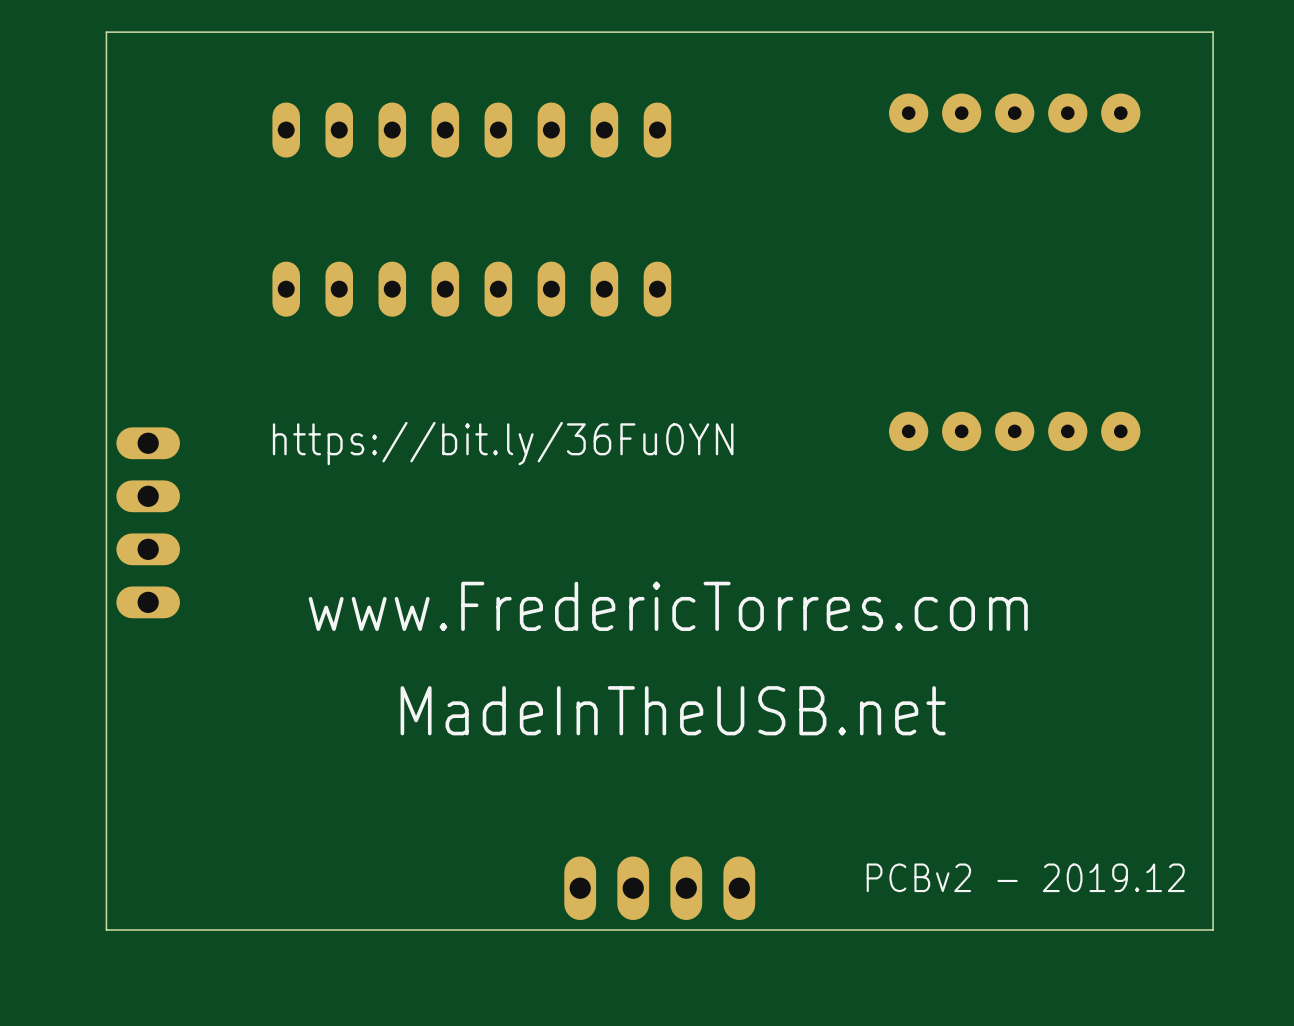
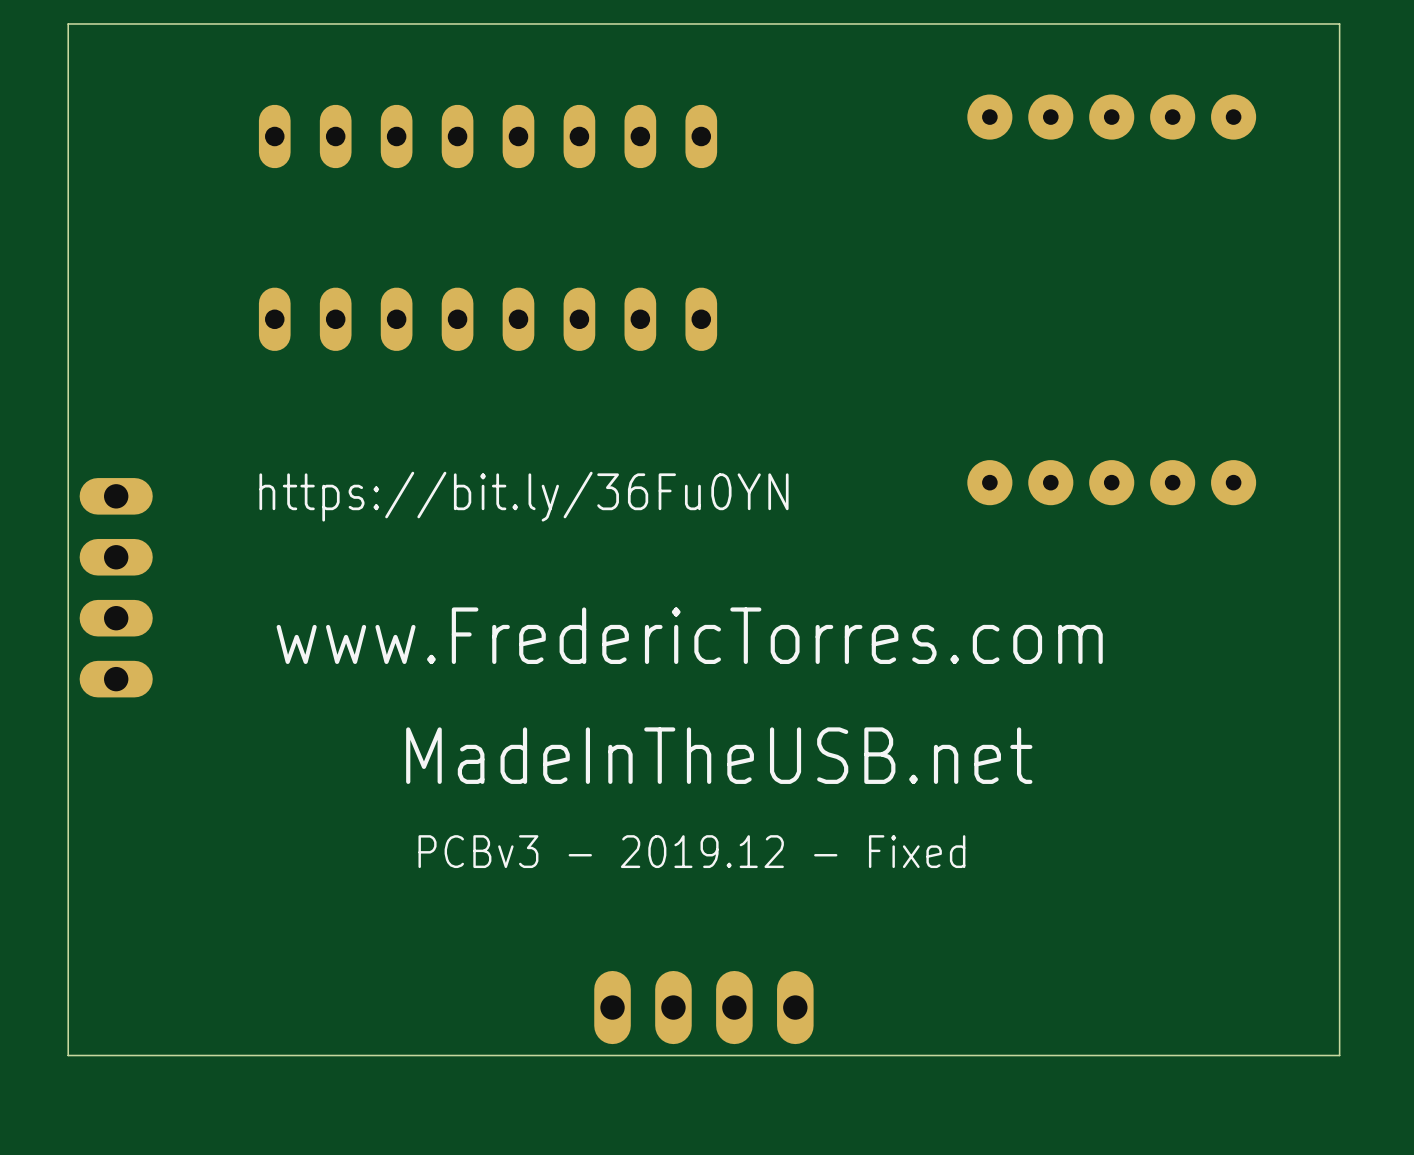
text position: www.FredericTorres.com (668, 606) -> www.FredericTorres.com (689, 635)
text position: MadeInTheUSB.net (673, 710) -> MadeInTheUSB.net (719, 755)
text: none -> PCBv3 - 2019.12 - Fixed (691, 851)
text: PCBv2 - 2019.12 (1025, 877) -> none

